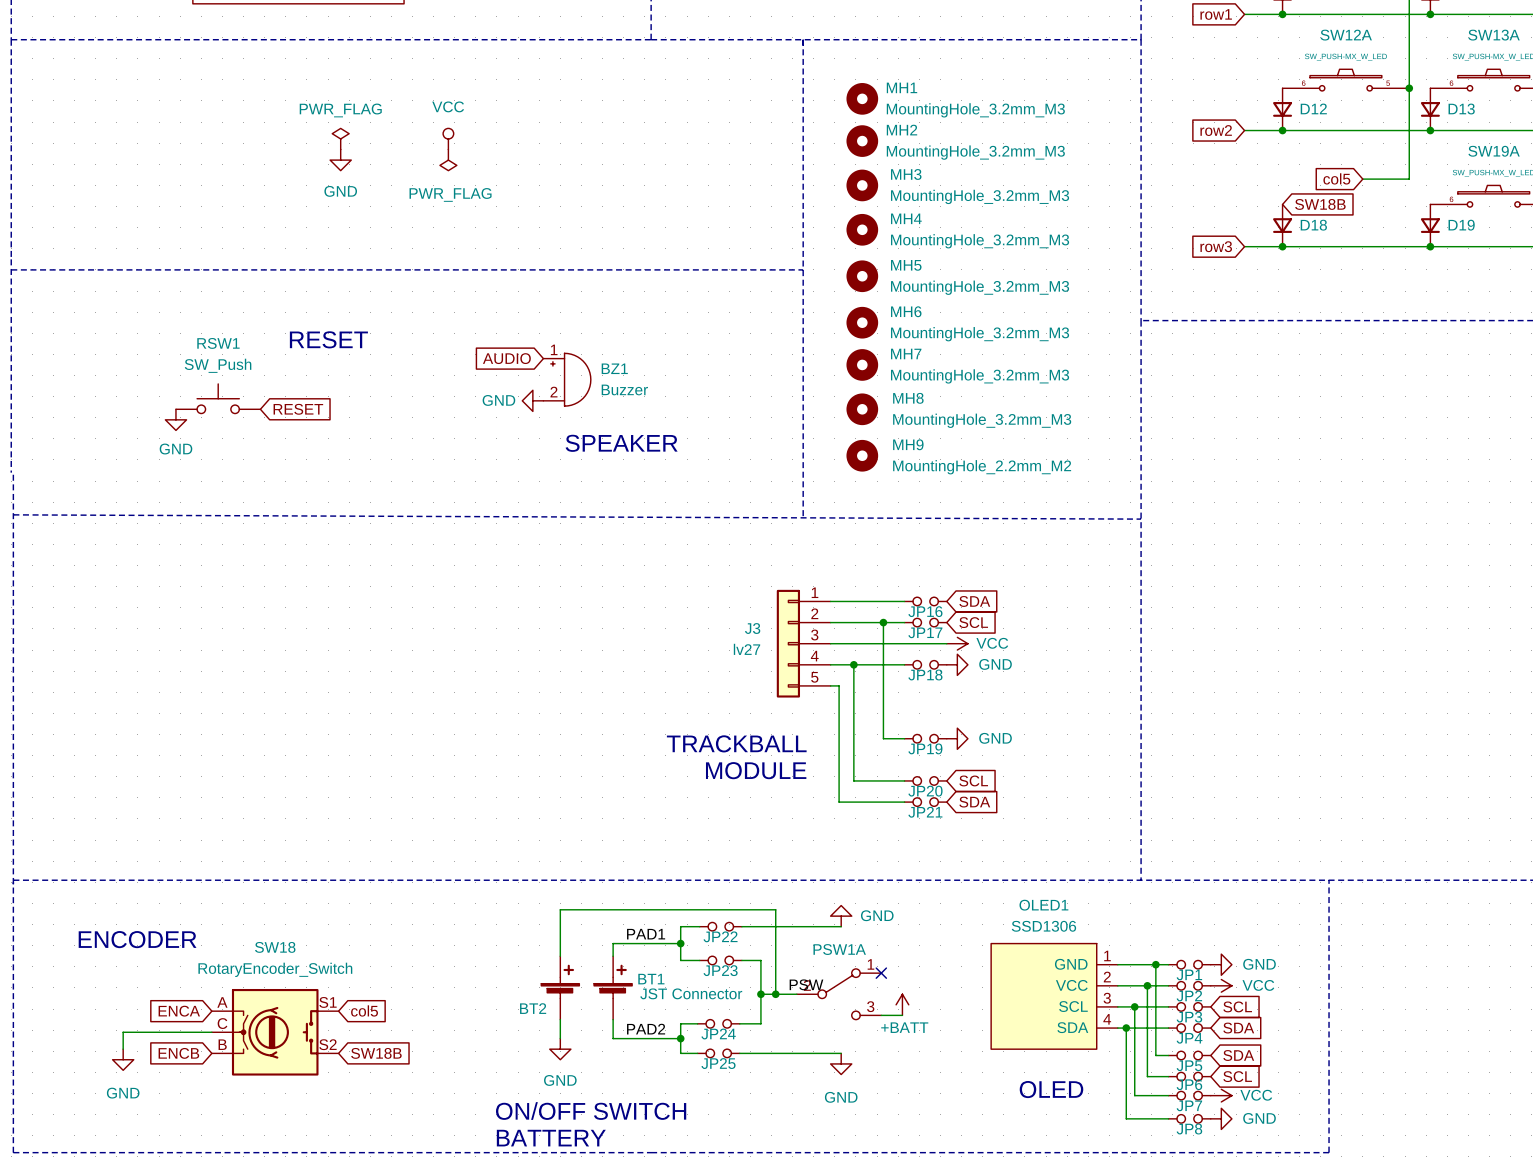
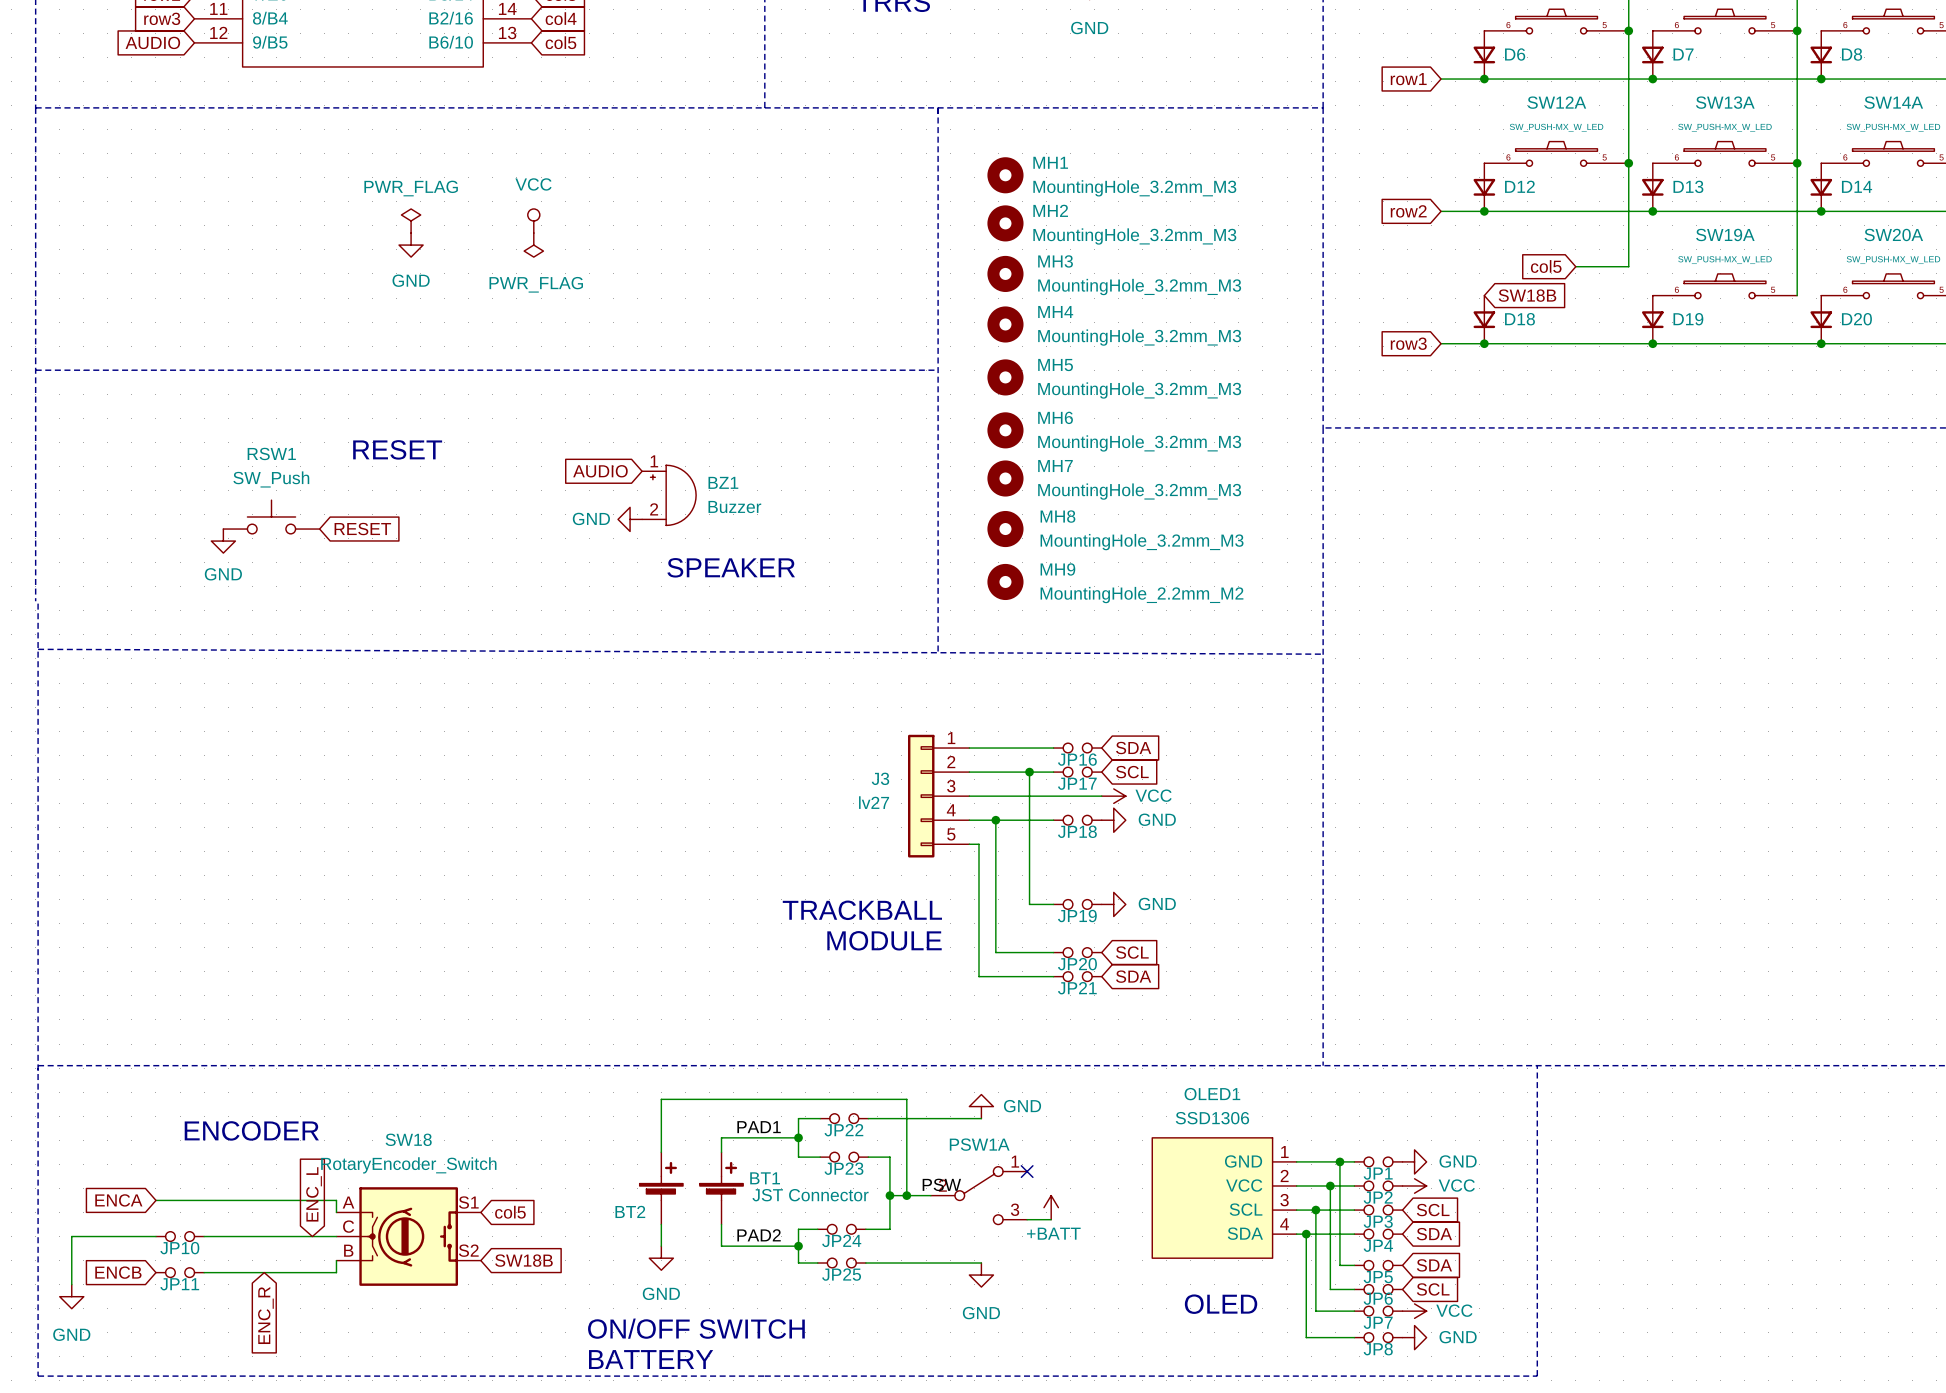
text position: ENCODER (137, 939) -> ENCODER (251, 1130)
global label: none -> ENC_L (314, 1194)
wire: none -> (155, 1200) (336, 1200) (336, 1212)
global label position: col5 (364, 1010) -> col5 (510, 1212)
global label position: ENCA (179, 1011) -> ENCA (118, 1200)
wire: none -> (155, 1236) (71, 1236) (71, 1284)
JP10: none -> (180, 1236)
wire: none -> (204, 1236) (336, 1236)
wire: (211, 1032) (123, 1032) (123, 1049) -> none
SW18 position: (275, 1032) -> (408, 1236)
wire: none -> (336, 1260) (336, 1272) (204, 1272)
global label position: ENCB (178, 1053) -> ENCB (118, 1272)
global label position: SW18B (376, 1053) -> SW18B (523, 1260)
power symbol position: GND (123, 1059) -> GND (71, 1296)
JP11: none -> (180, 1272)
global label: none -> ENC_R (265, 1315)

